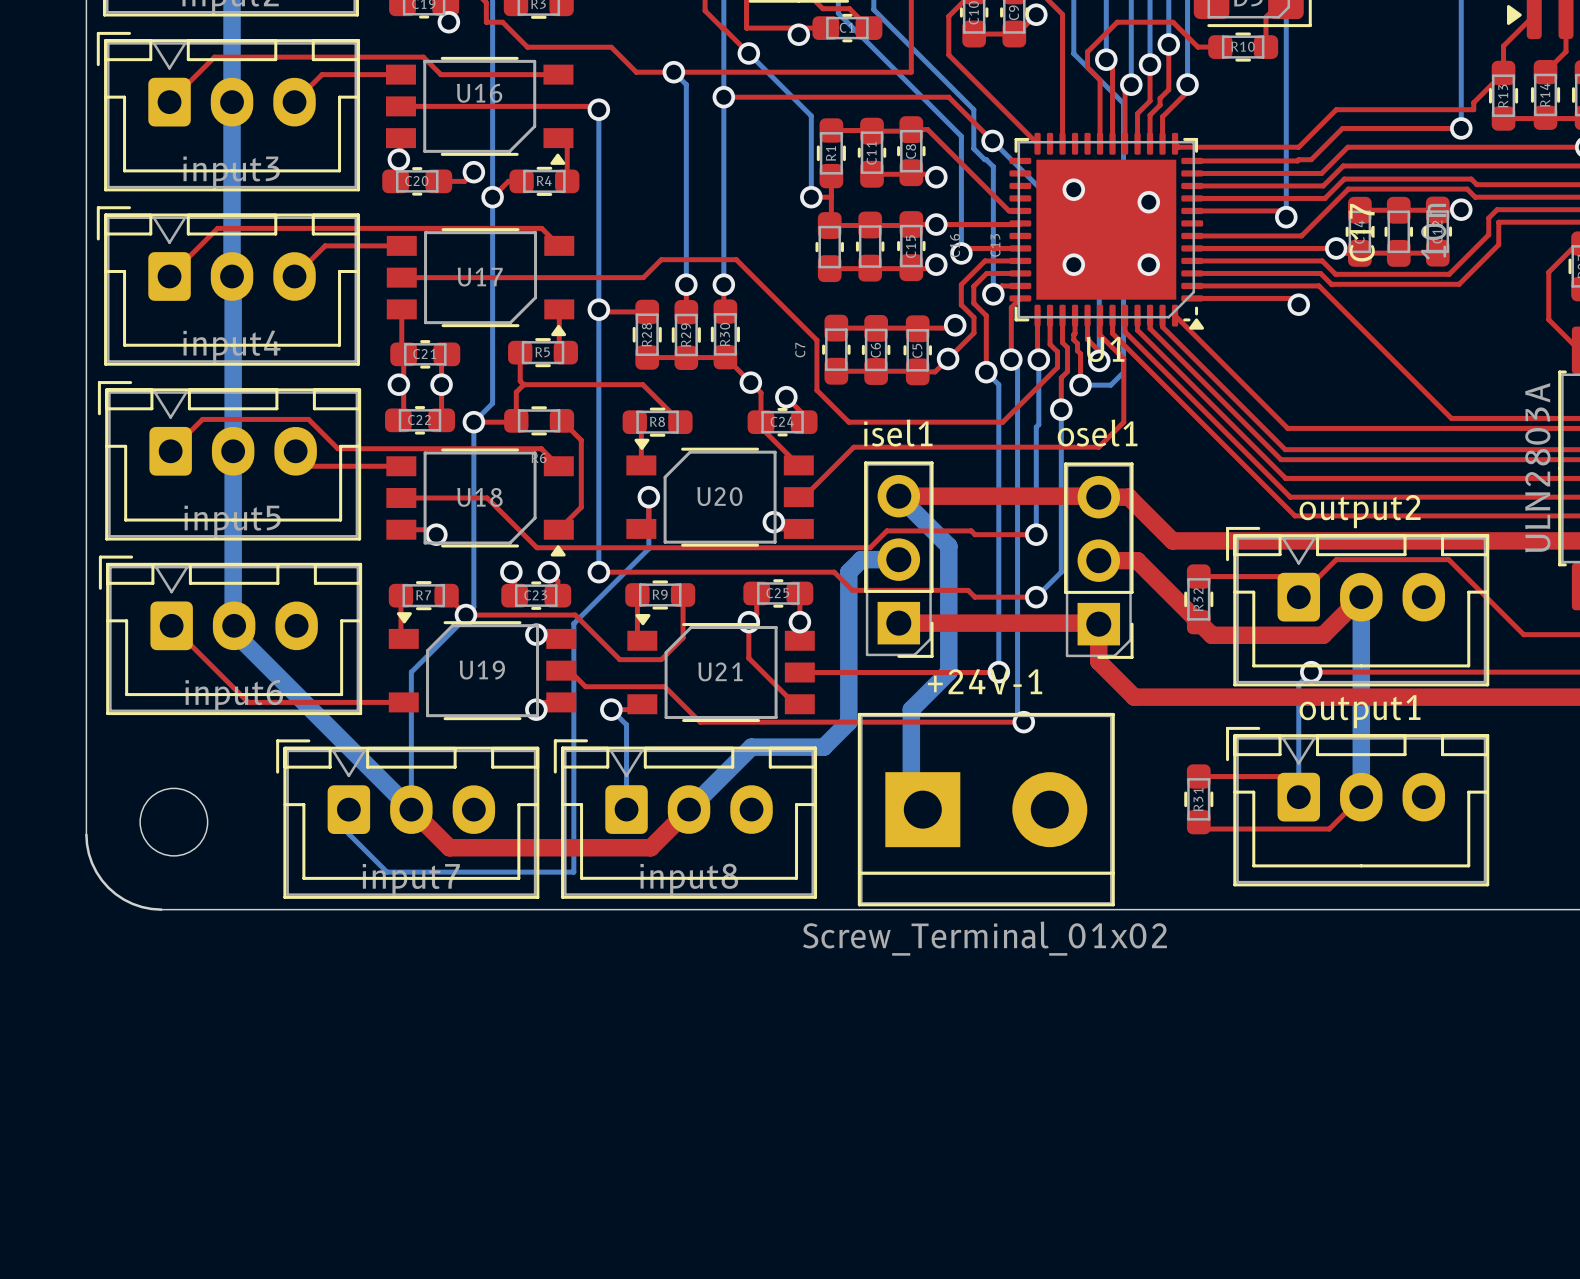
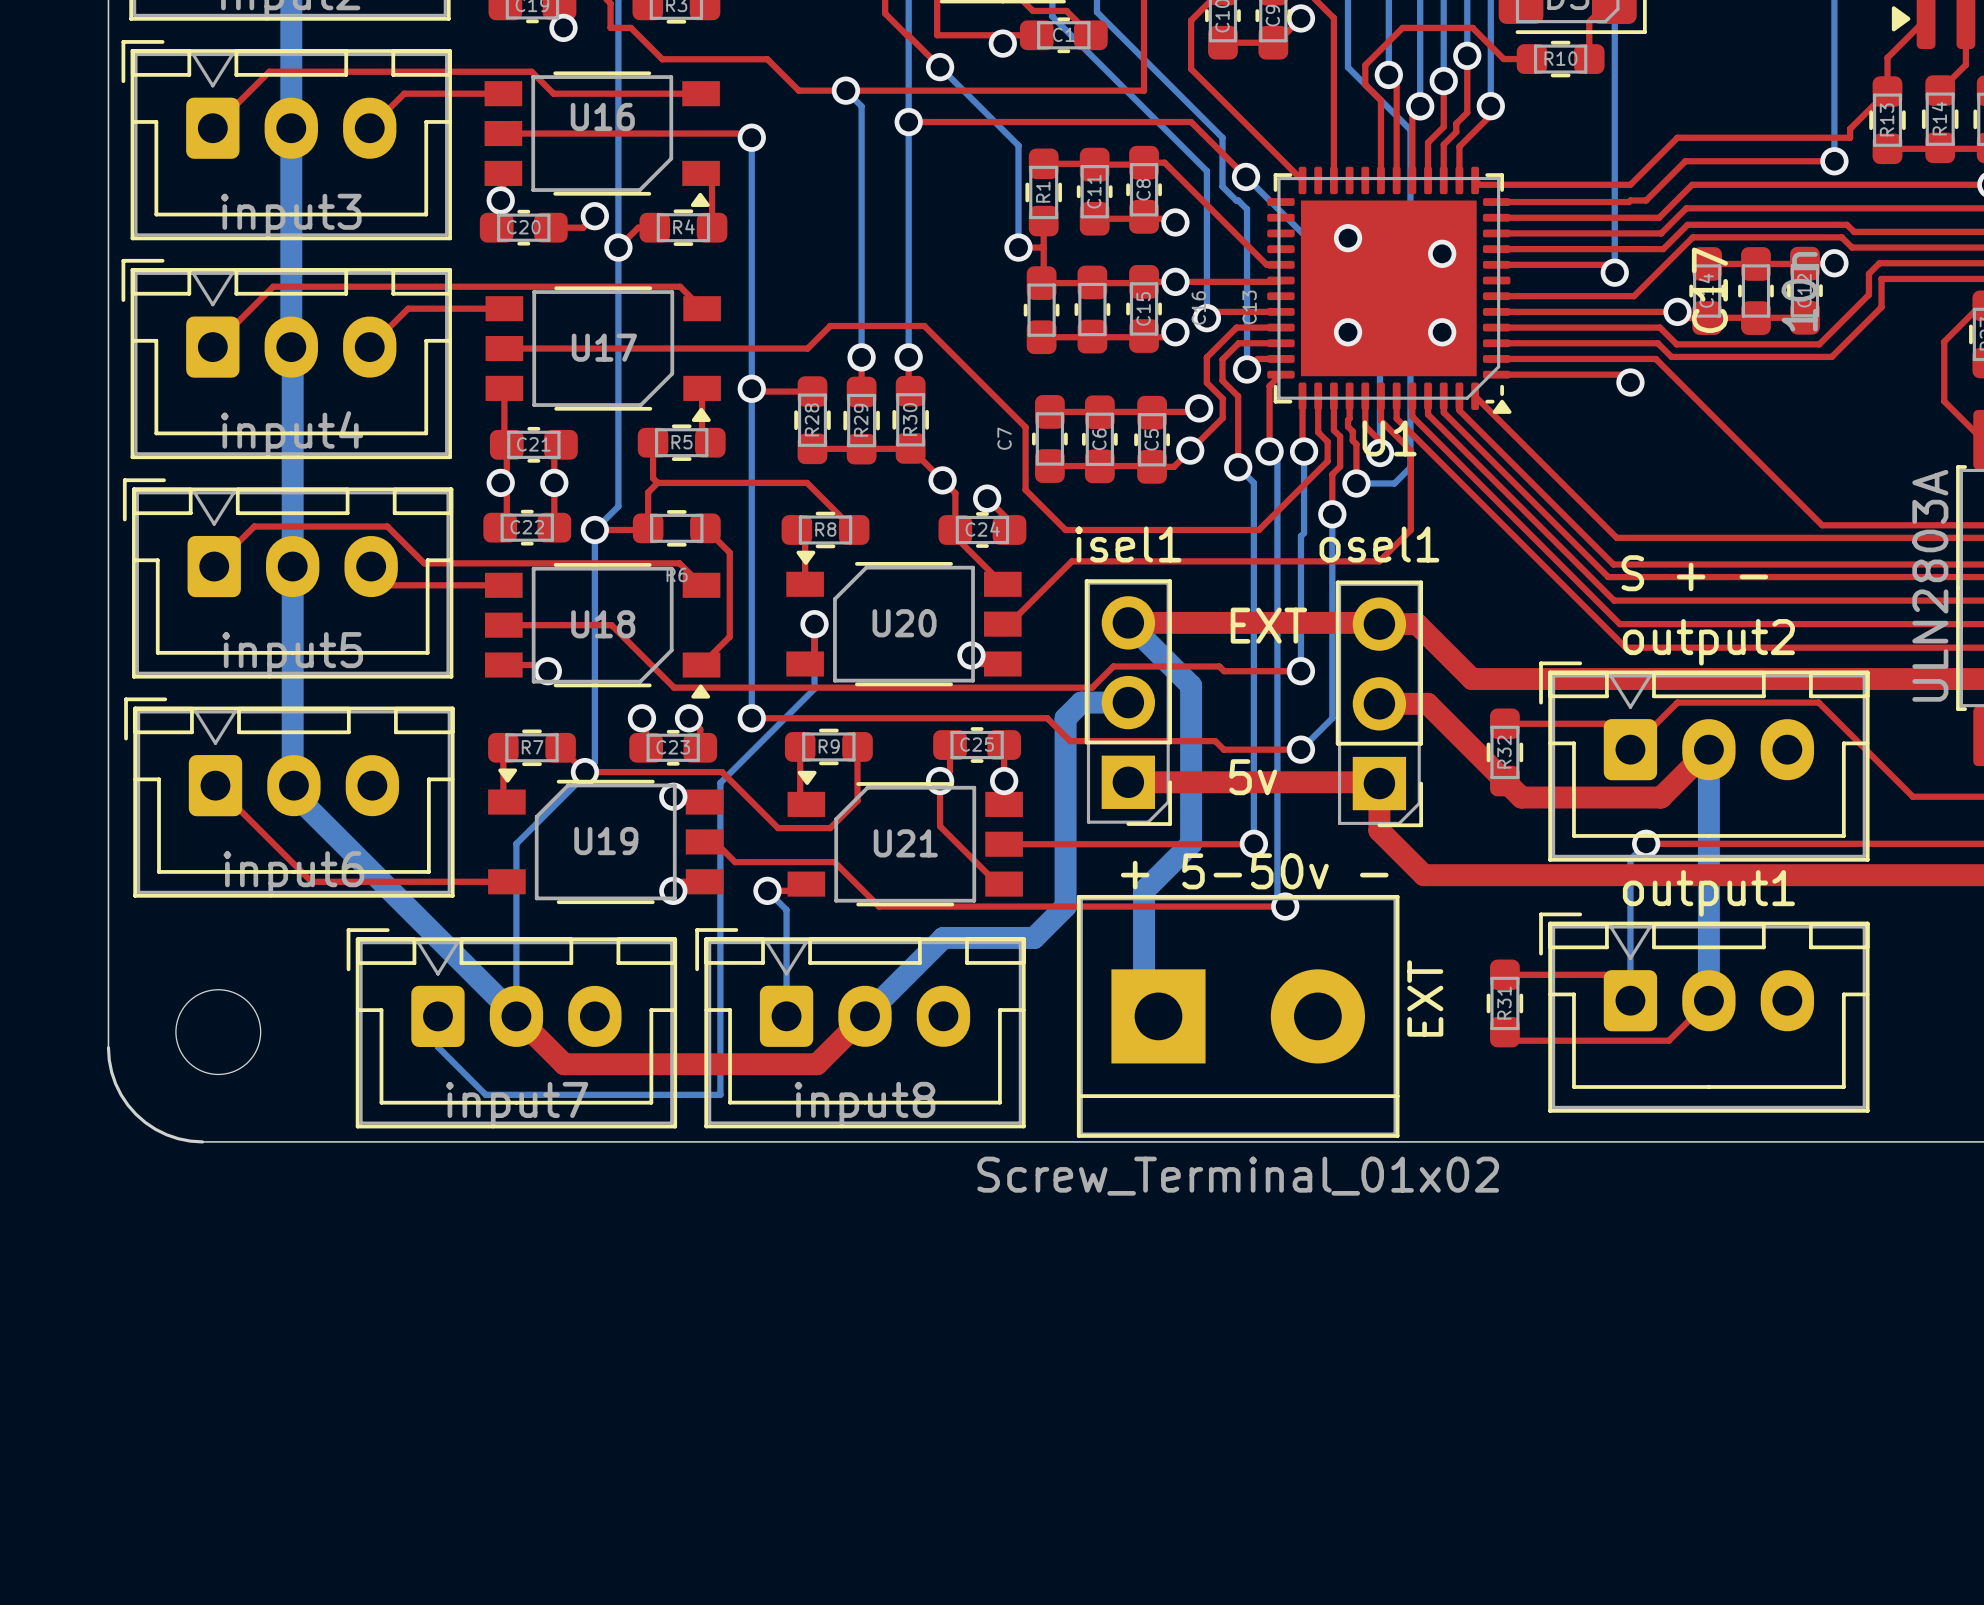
text: none -> S + - (1694, 573)
text: none -> EXT (1268, 625)
text: none -> 5v (1253, 777)
+24V-1 name: +24V-1 (985, 681) -> EXT (1425, 998)
text: none -> + 5-50v - (1254, 871)

